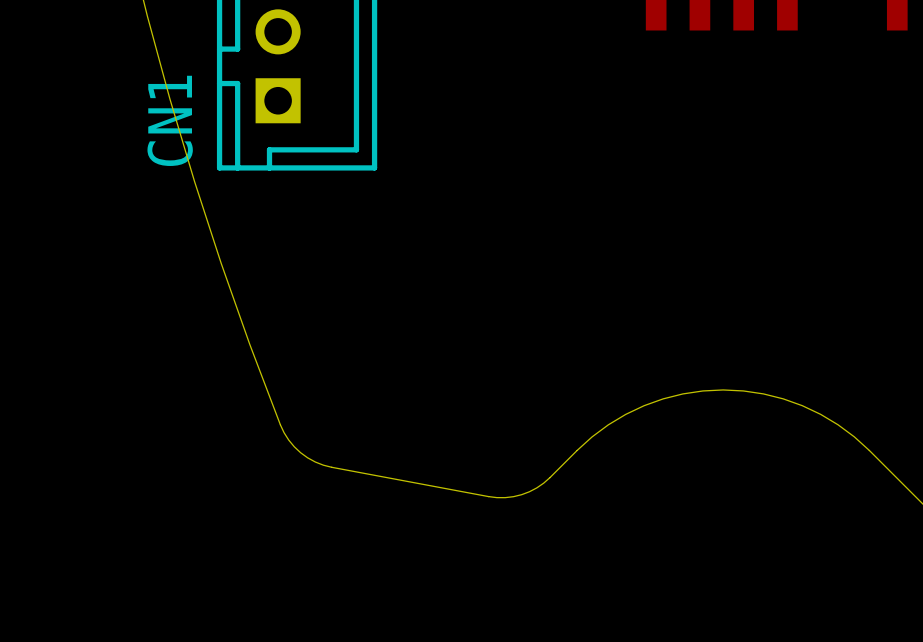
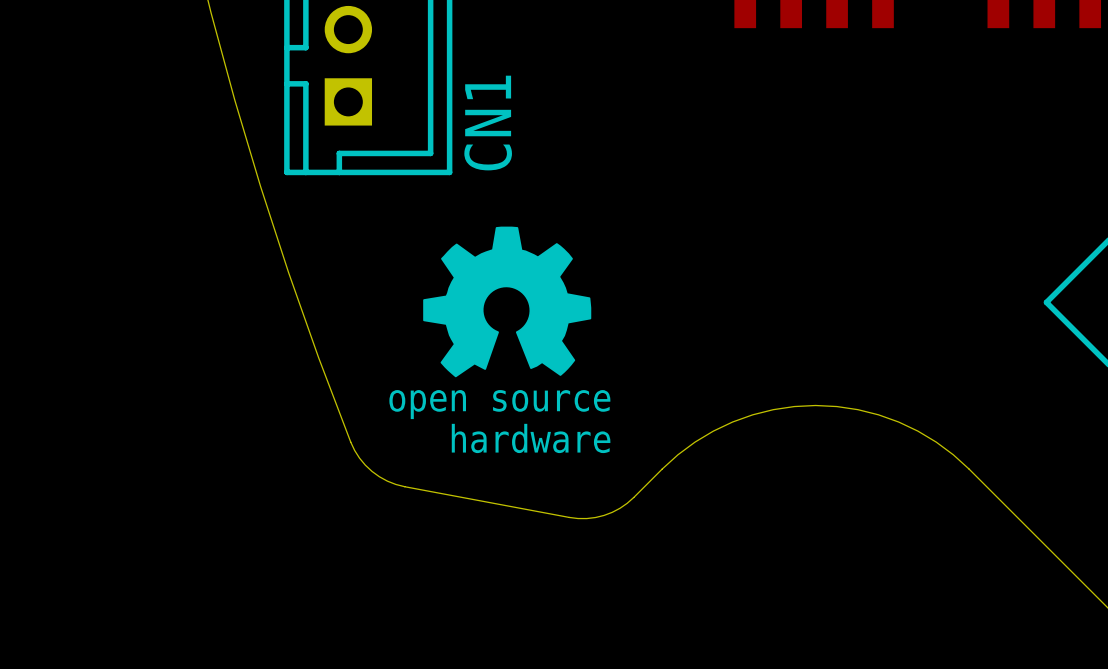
CN1 name position: CN1 (170, 120) -> CN1 (488, 123)
drawing: none -> [423, 226, 592, 378]

